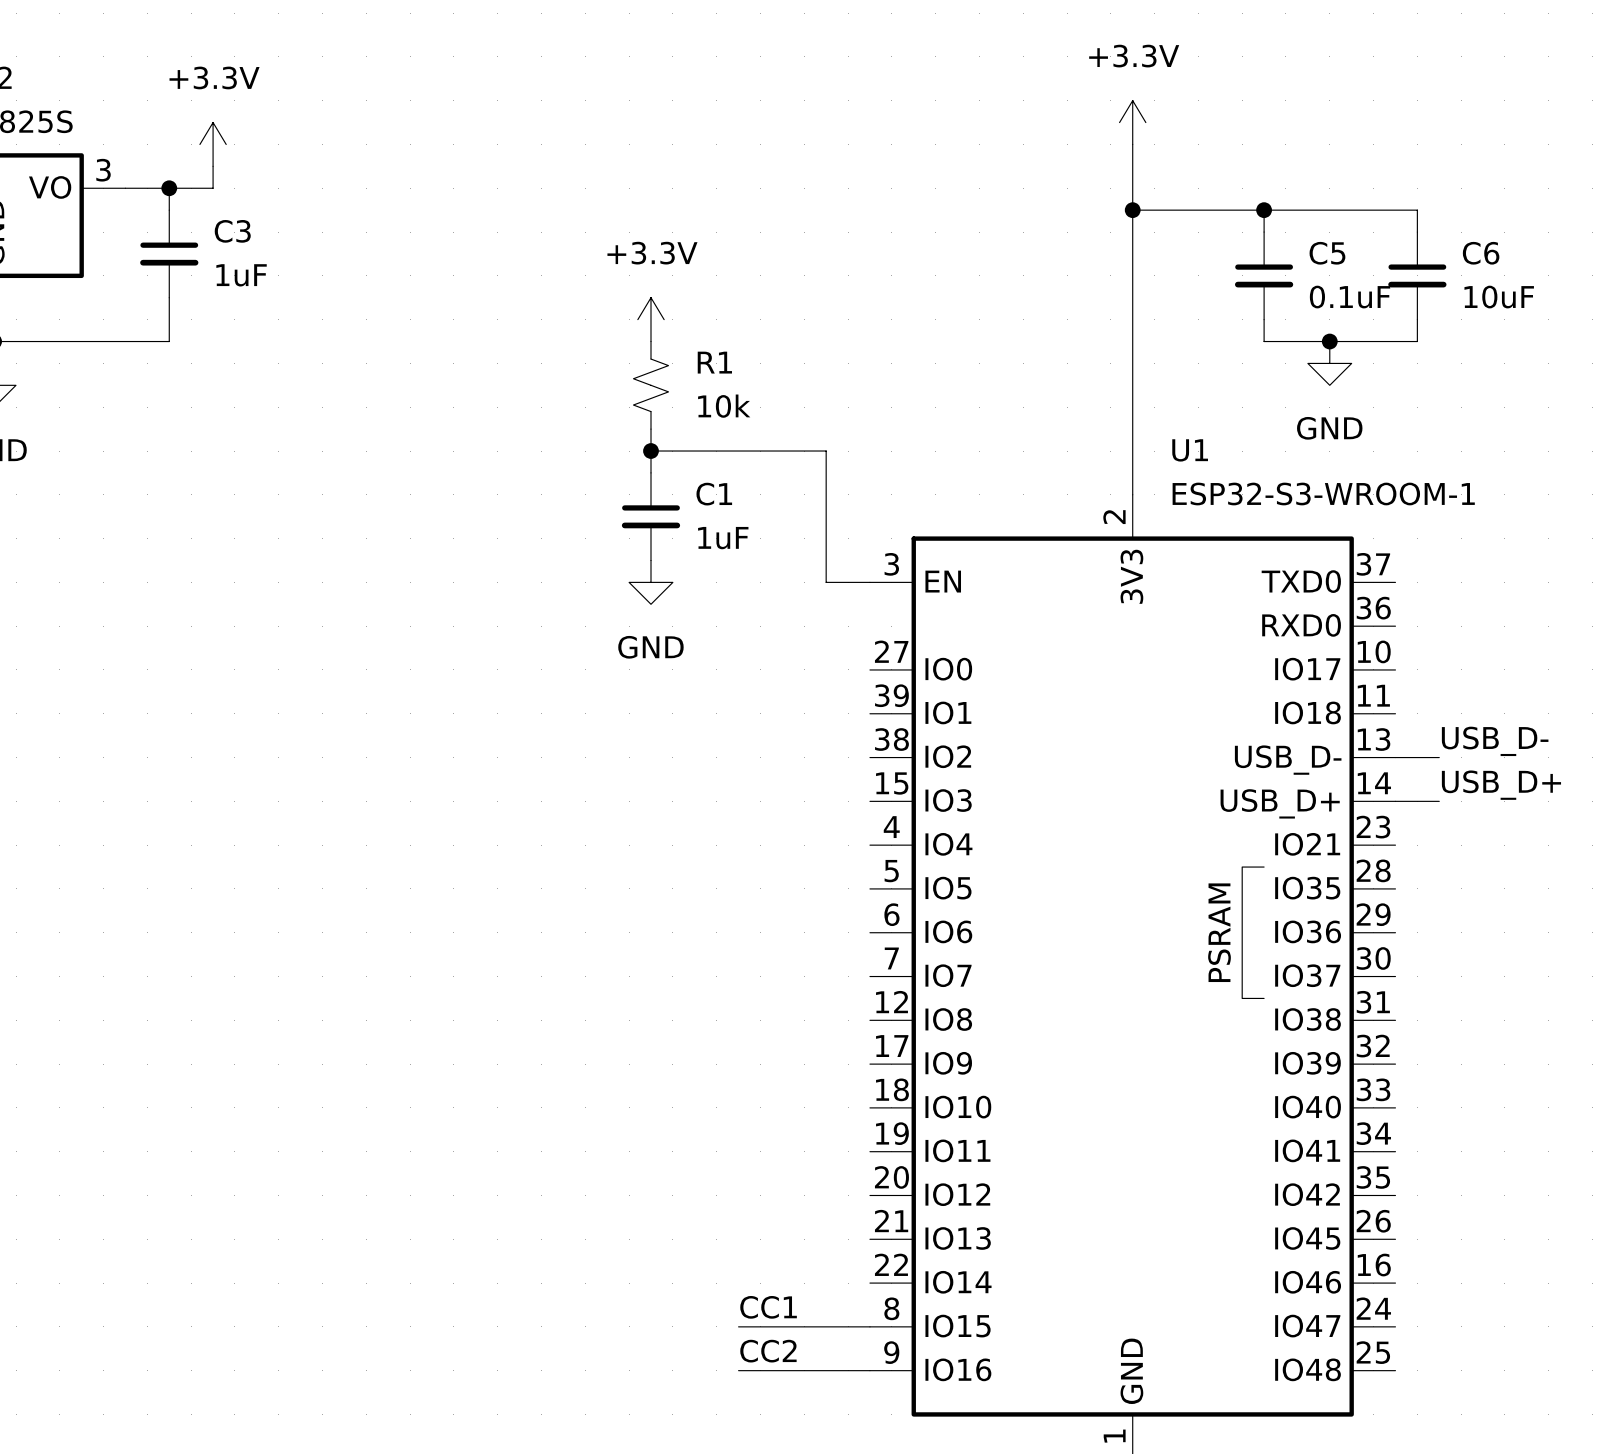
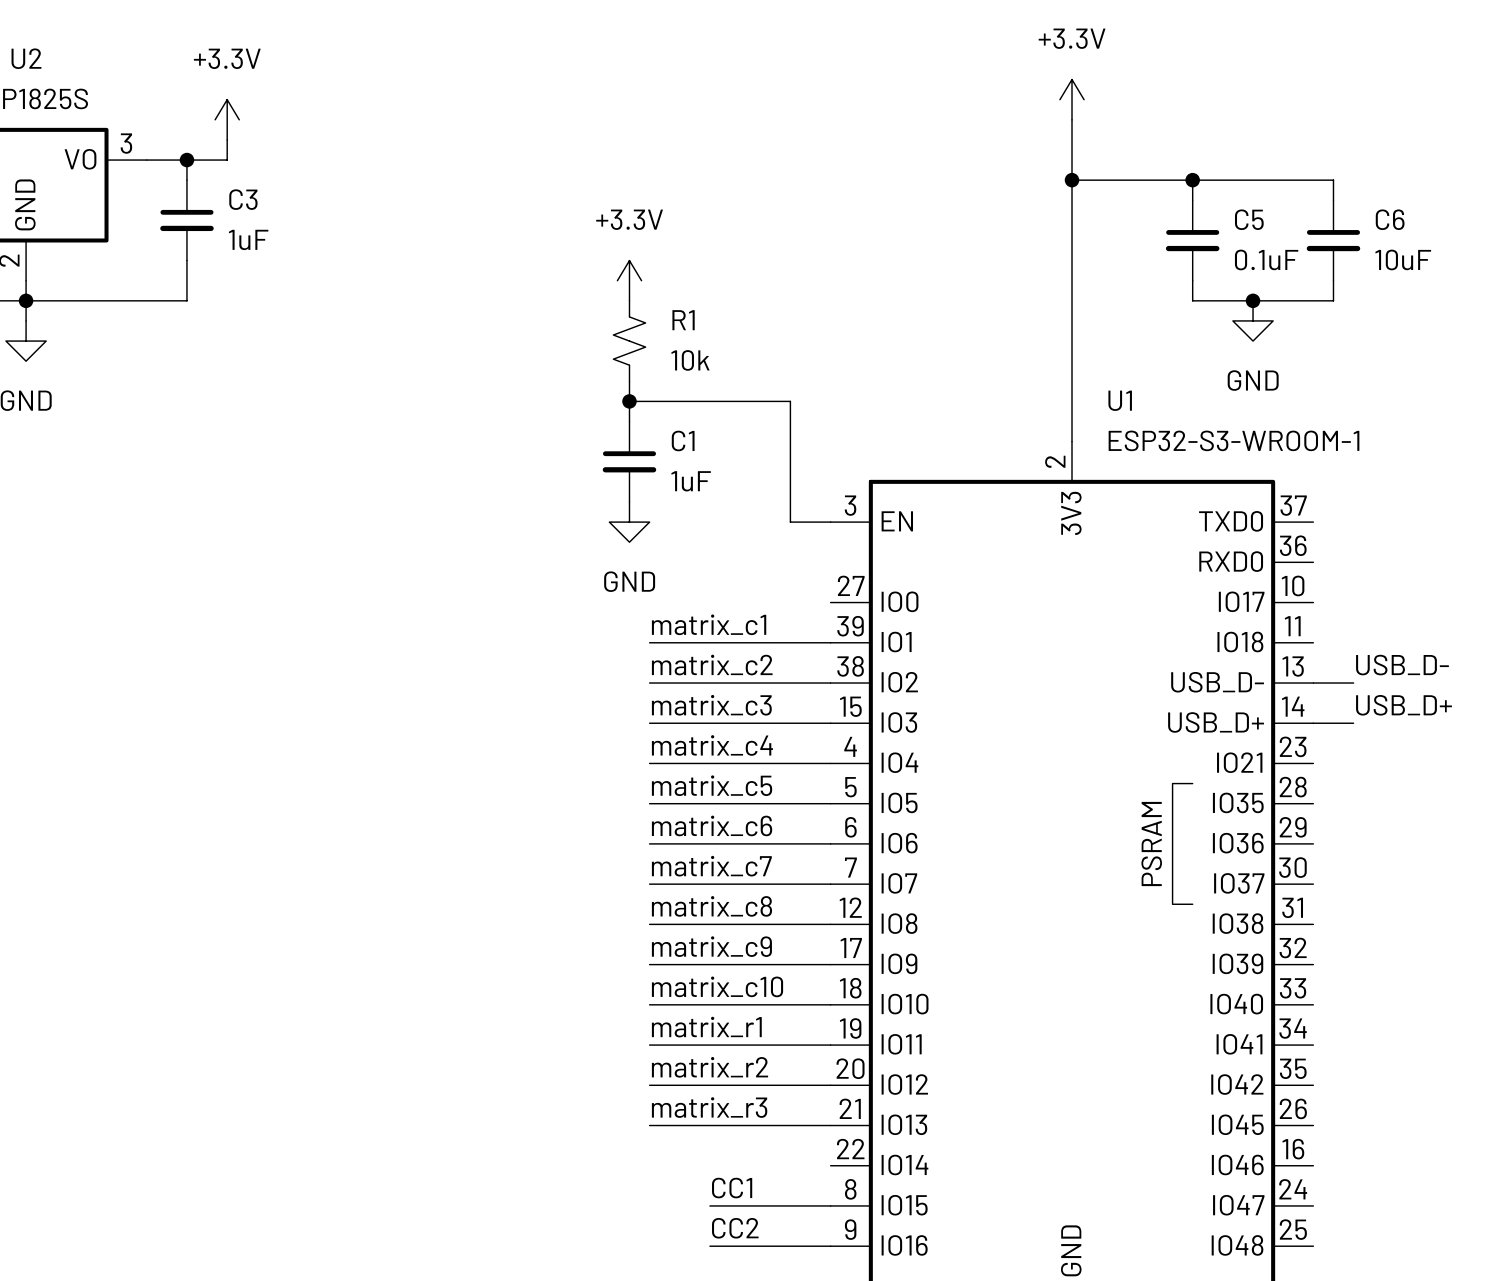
label: none -> matrix_c1 (709, 624)
wire: none -> (649, 642) (830, 642)
label: none -> matrix_c2 (712, 665)
wire: none -> (649, 683) (830, 683)
label: none -> matrix_c3 (711, 705)
wire: none -> (649, 723) (830, 723)
label: none -> matrix_c4 (712, 745)
wire: none -> (649, 763) (830, 763)
label: none -> matrix_c5 (712, 785)
wire: none -> (649, 803) (830, 803)
label: none -> matrix_c6 (712, 825)
wire: none -> (649, 843) (830, 843)
label: none -> matrix_c7 (711, 866)
wire: none -> (649, 884) (830, 884)
label: none -> matrix_c8 (711, 906)
wire: none -> (649, 924) (830, 924)
label: none -> matrix_c9 (711, 946)
wire: none -> (649, 964) (830, 964)
label: none -> matrix_c10 (717, 986)
wire: none -> (649, 1004) (830, 1004)
label: none -> matrix_r1 (706, 1027)
wire: none -> (649, 1045) (830, 1045)
label: none -> matrix_r2 (710, 1067)
wire: none -> (649, 1085) (830, 1085)
label: none -> matrix_r3 (709, 1107)
wire: none -> (649, 1125) (830, 1125)

